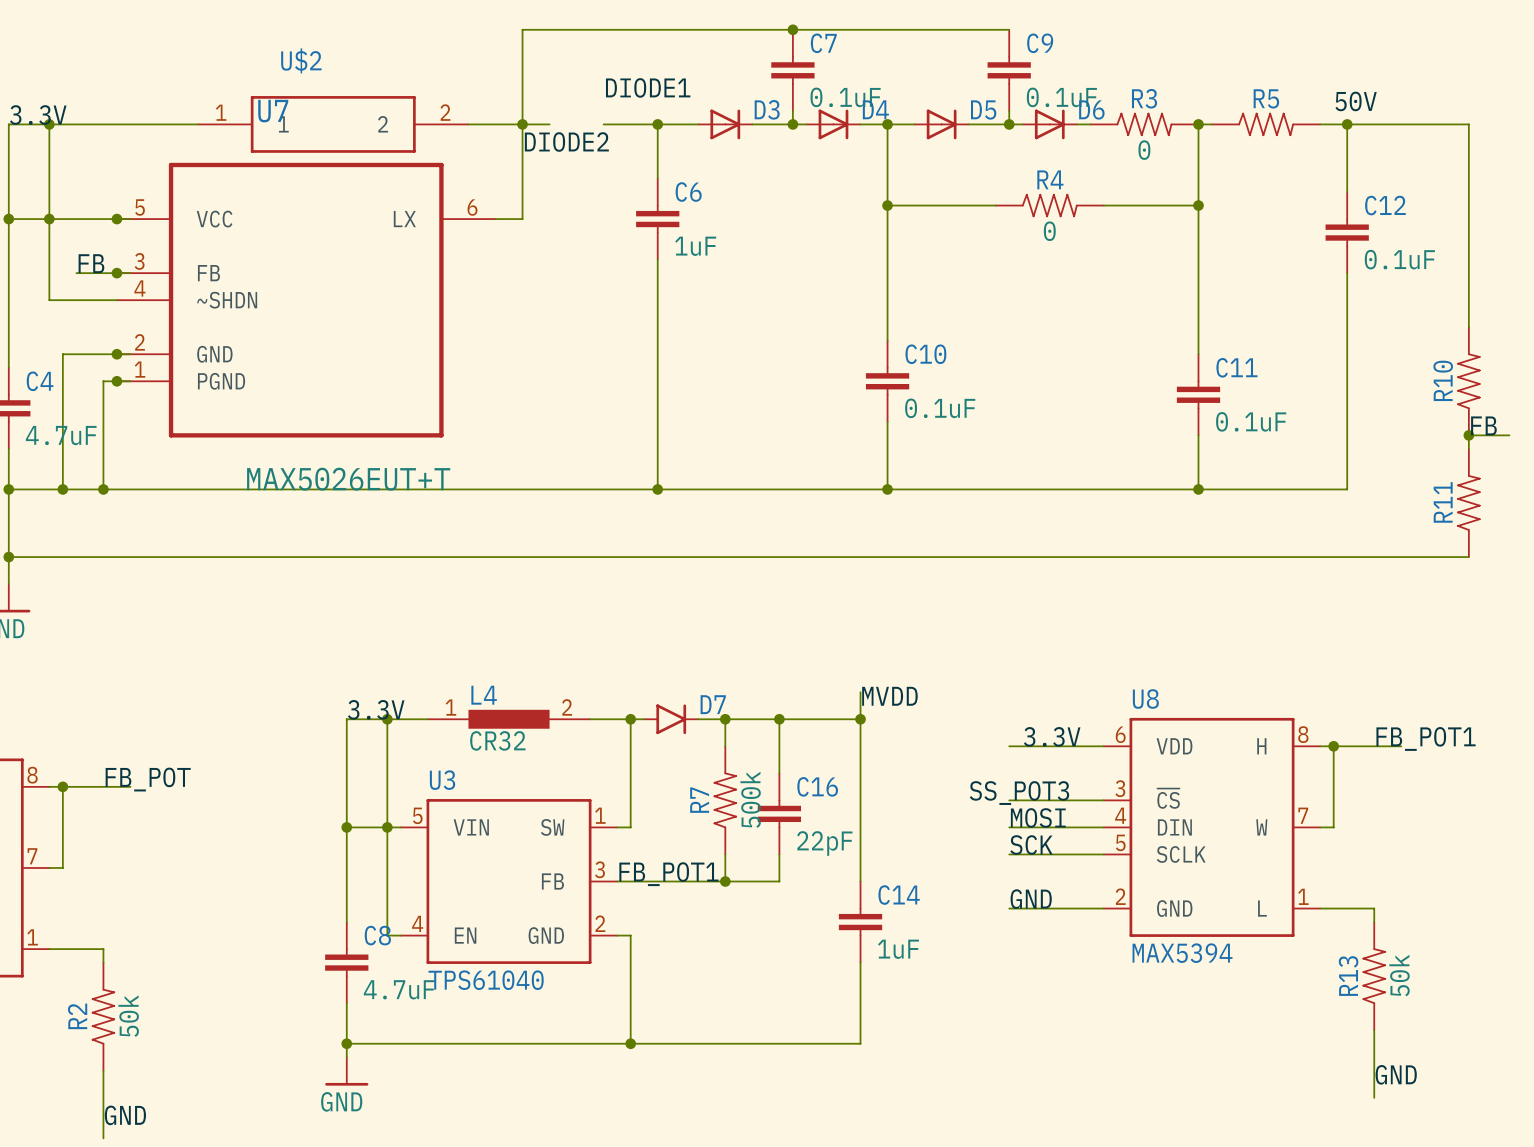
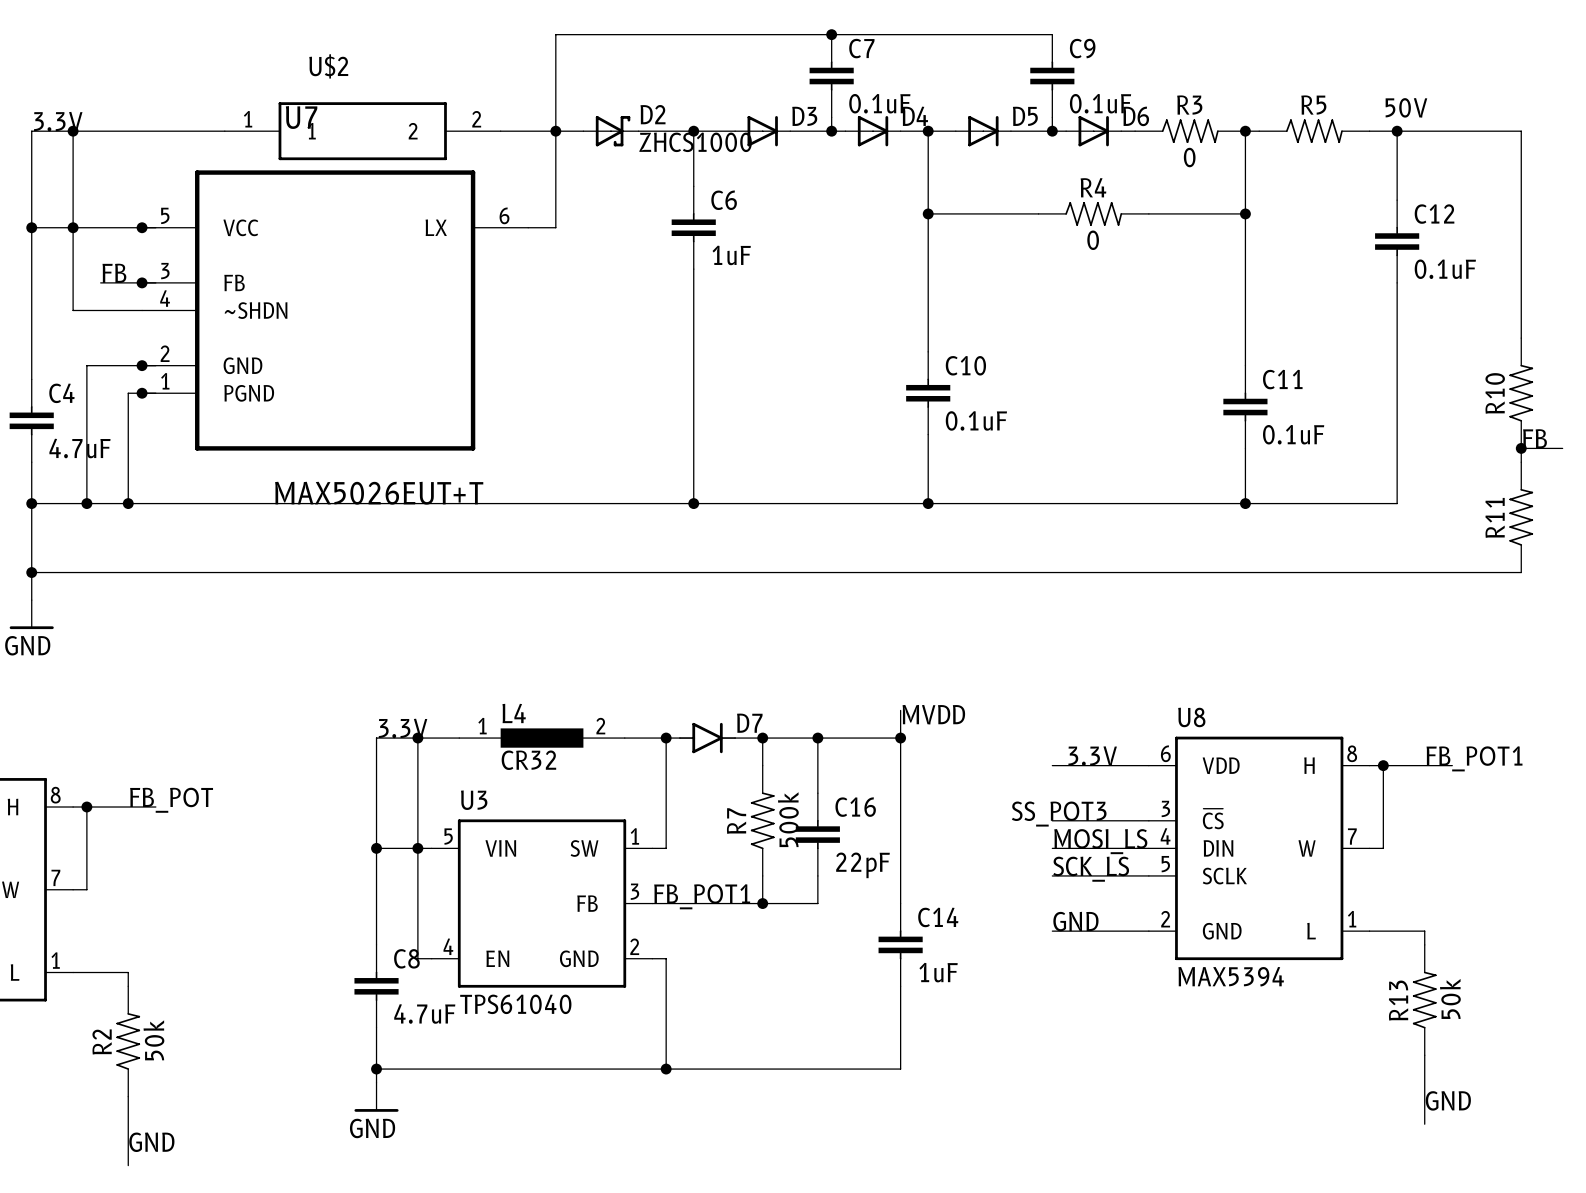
label: DIODE1 (648, 87) -> none
D2: none -> ZHCS1000 (610, 131)
label: DIODE2 (566, 142) -> none
label: MOSI (1038, 817) -> MOSI_LS (1100, 841)
label: SCK (1031, 845) -> SCK_LS (1091, 869)

